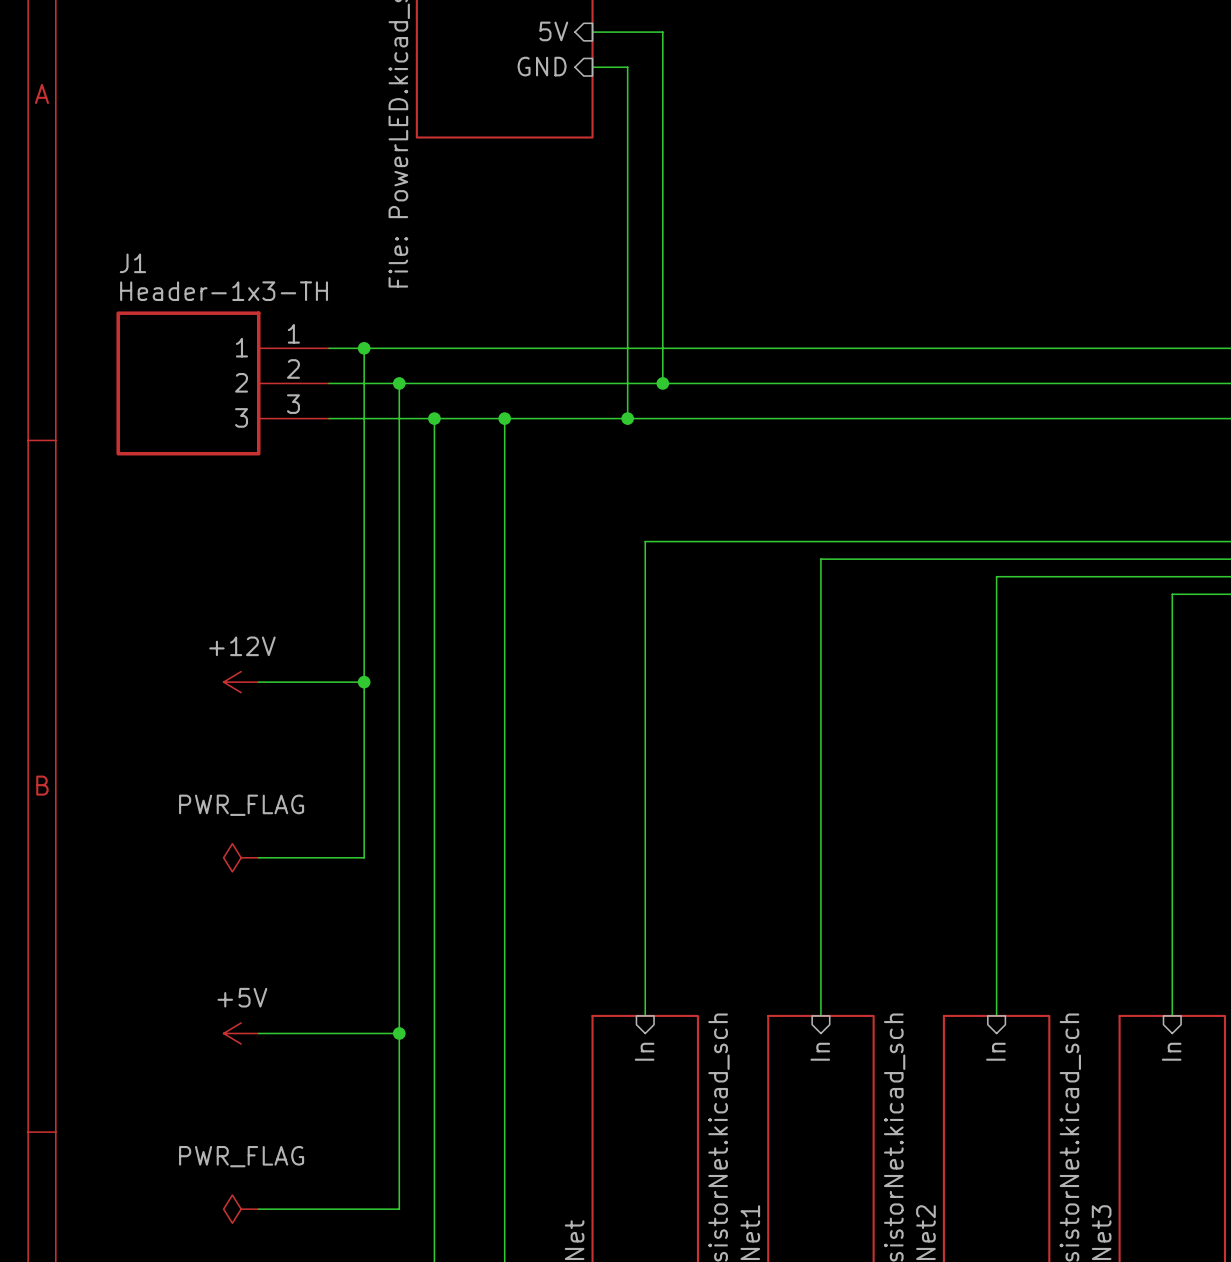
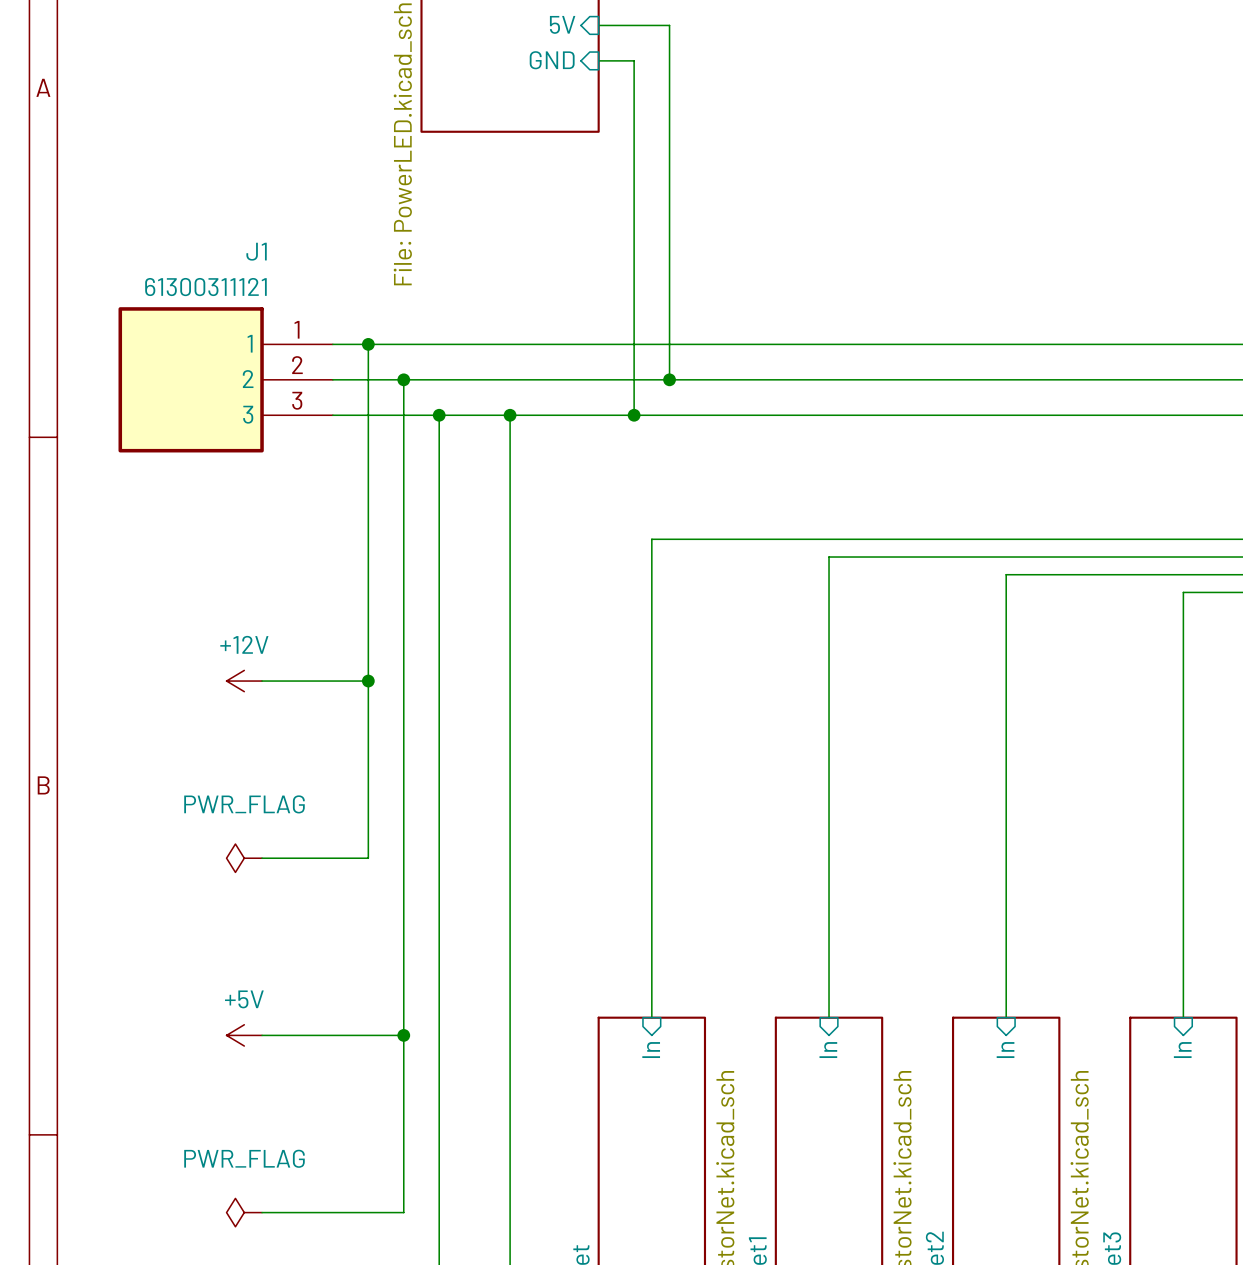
J1 name position: J1 (132, 263) -> J1 (256, 251)
J1 value: Header-1x3-TH (224, 291) -> 61300311121 (205, 287)

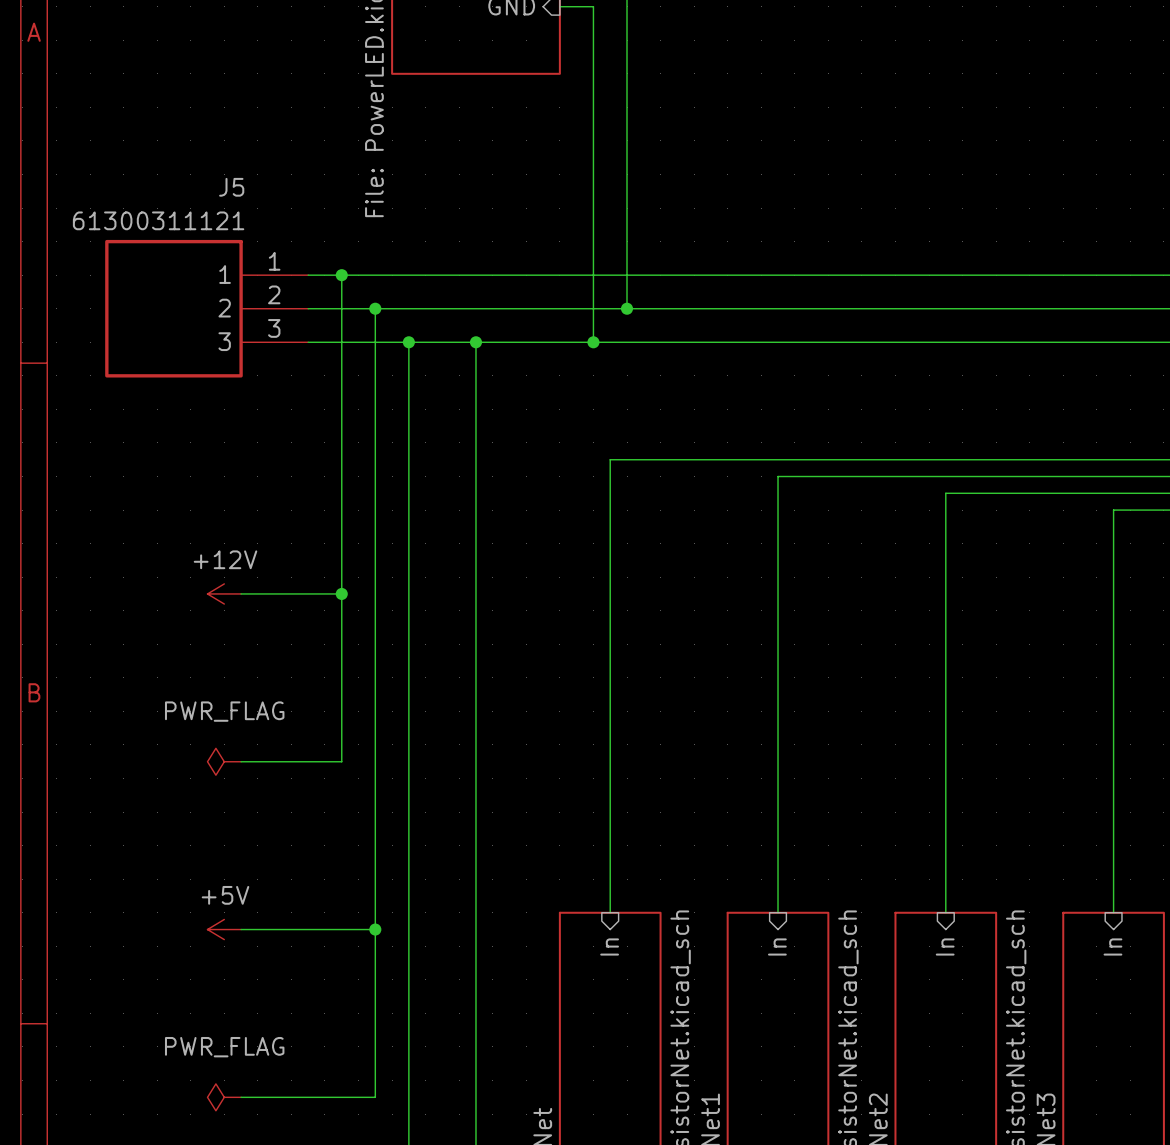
J1 name: J1 (256, 251) -> J5 (231, 187)

